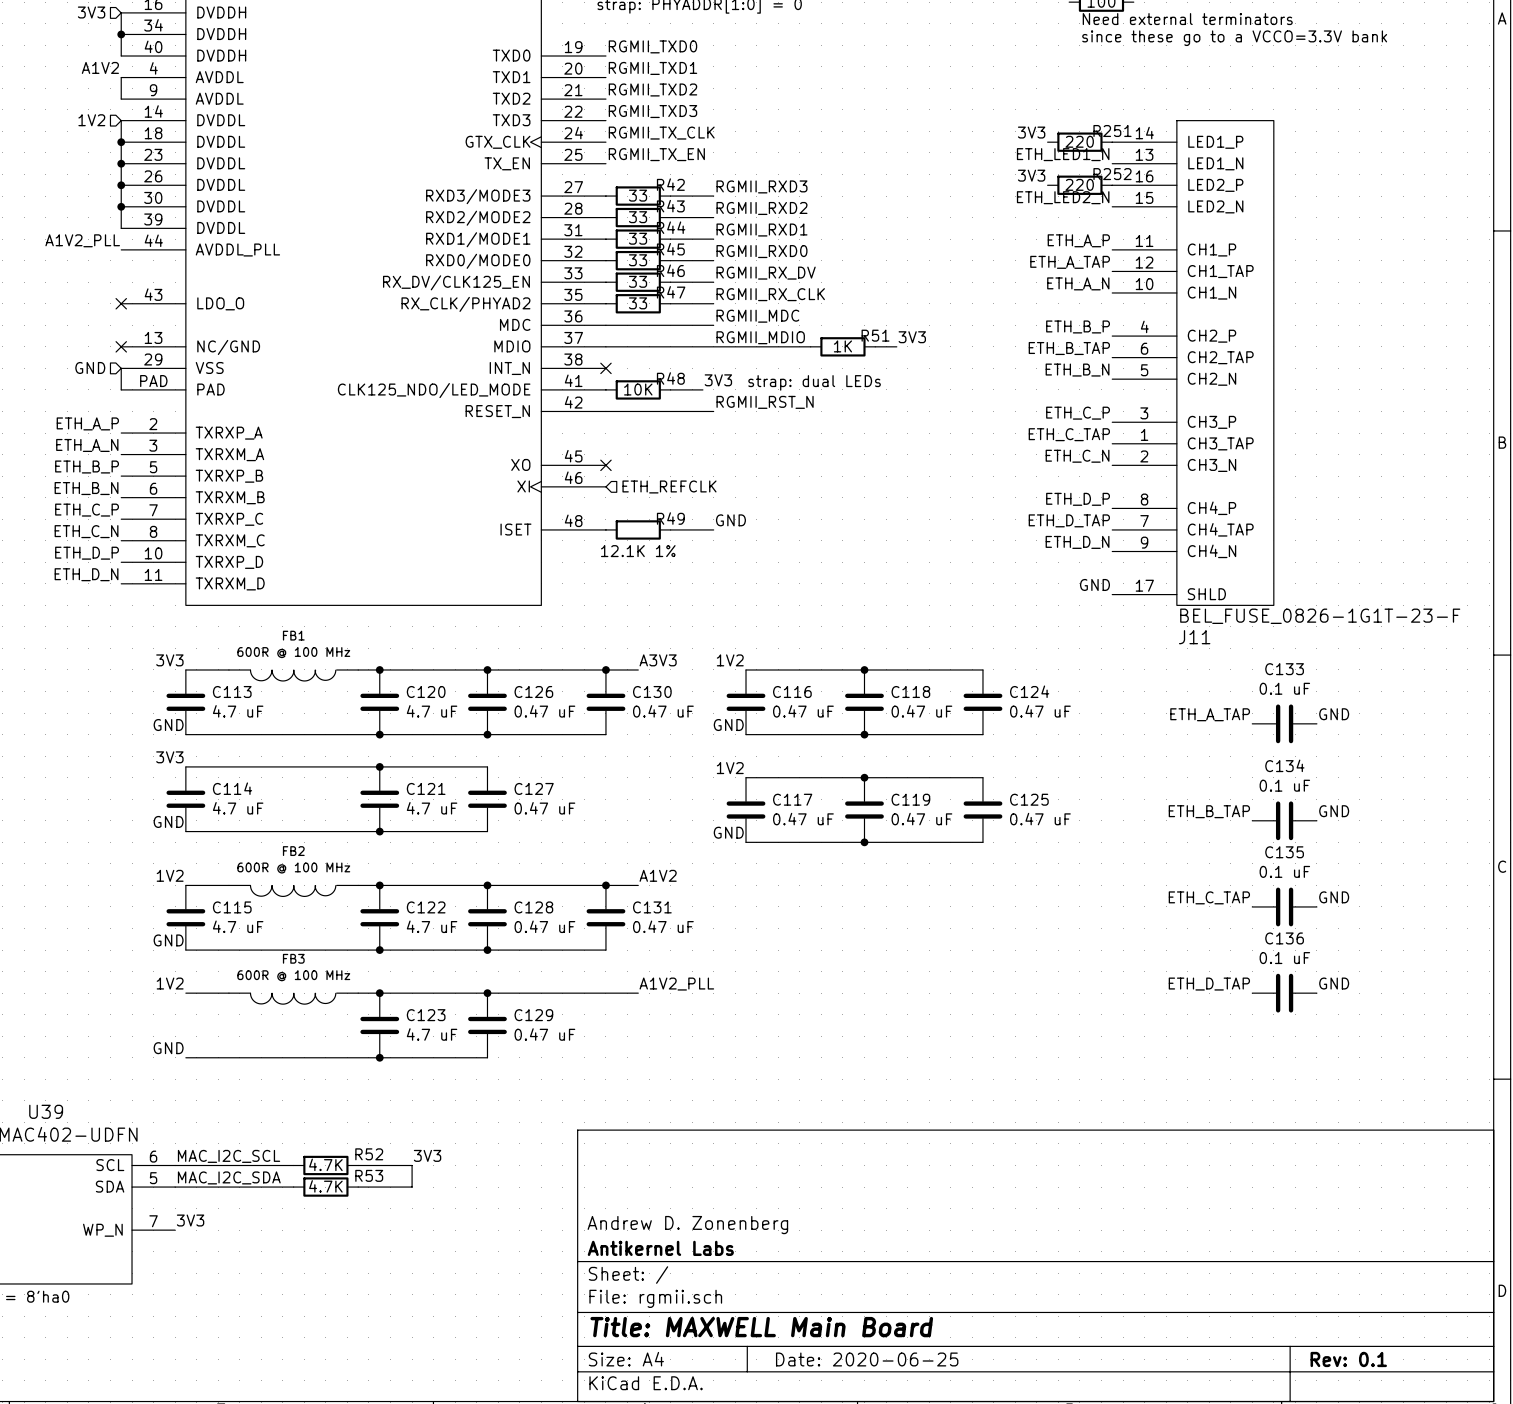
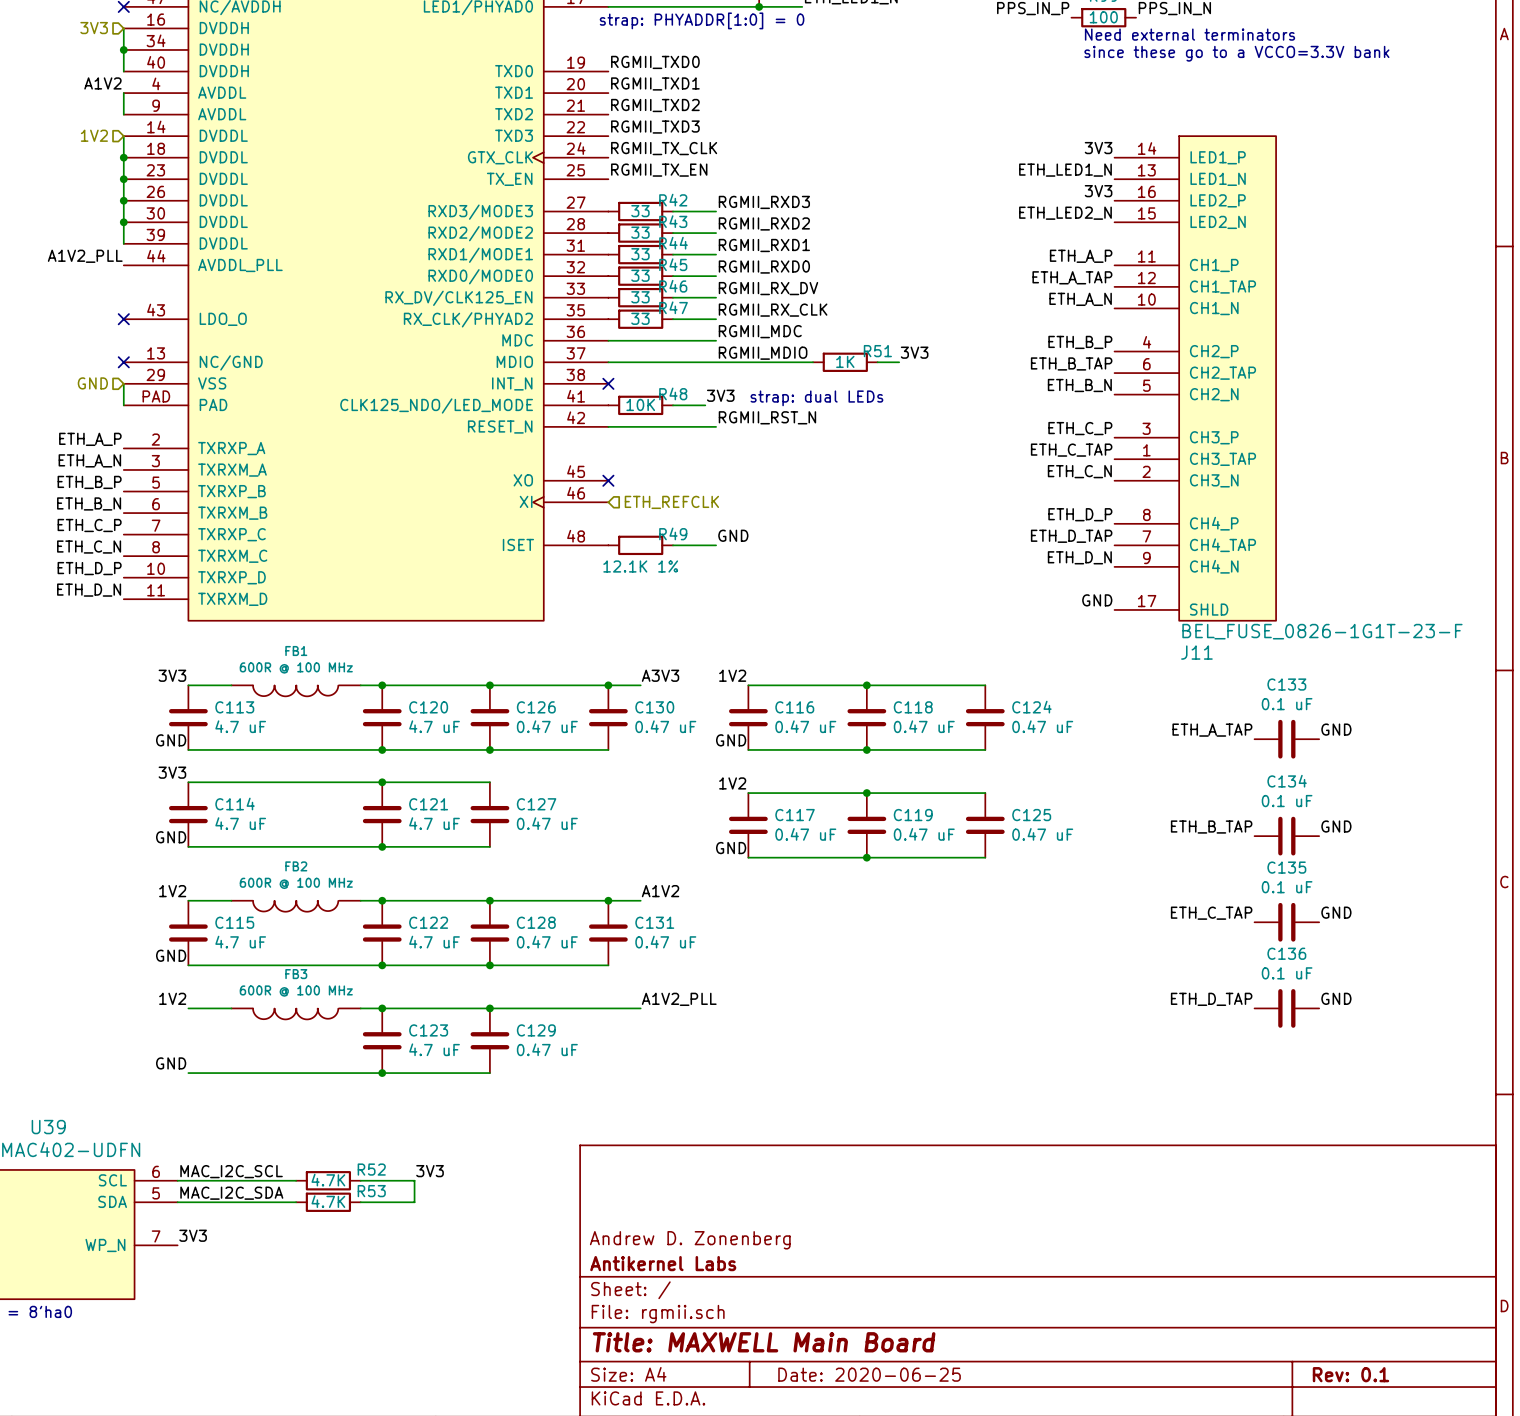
label: 3V3 (1031, 132) -> none
label: none -> 3V3 (1098, 148)
R251: 220 (1079, 142) -> none
label: 3V3 (1031, 175) -> none
label: none -> 3V3 (1098, 191)
R252: 220 (1079, 185) -> none

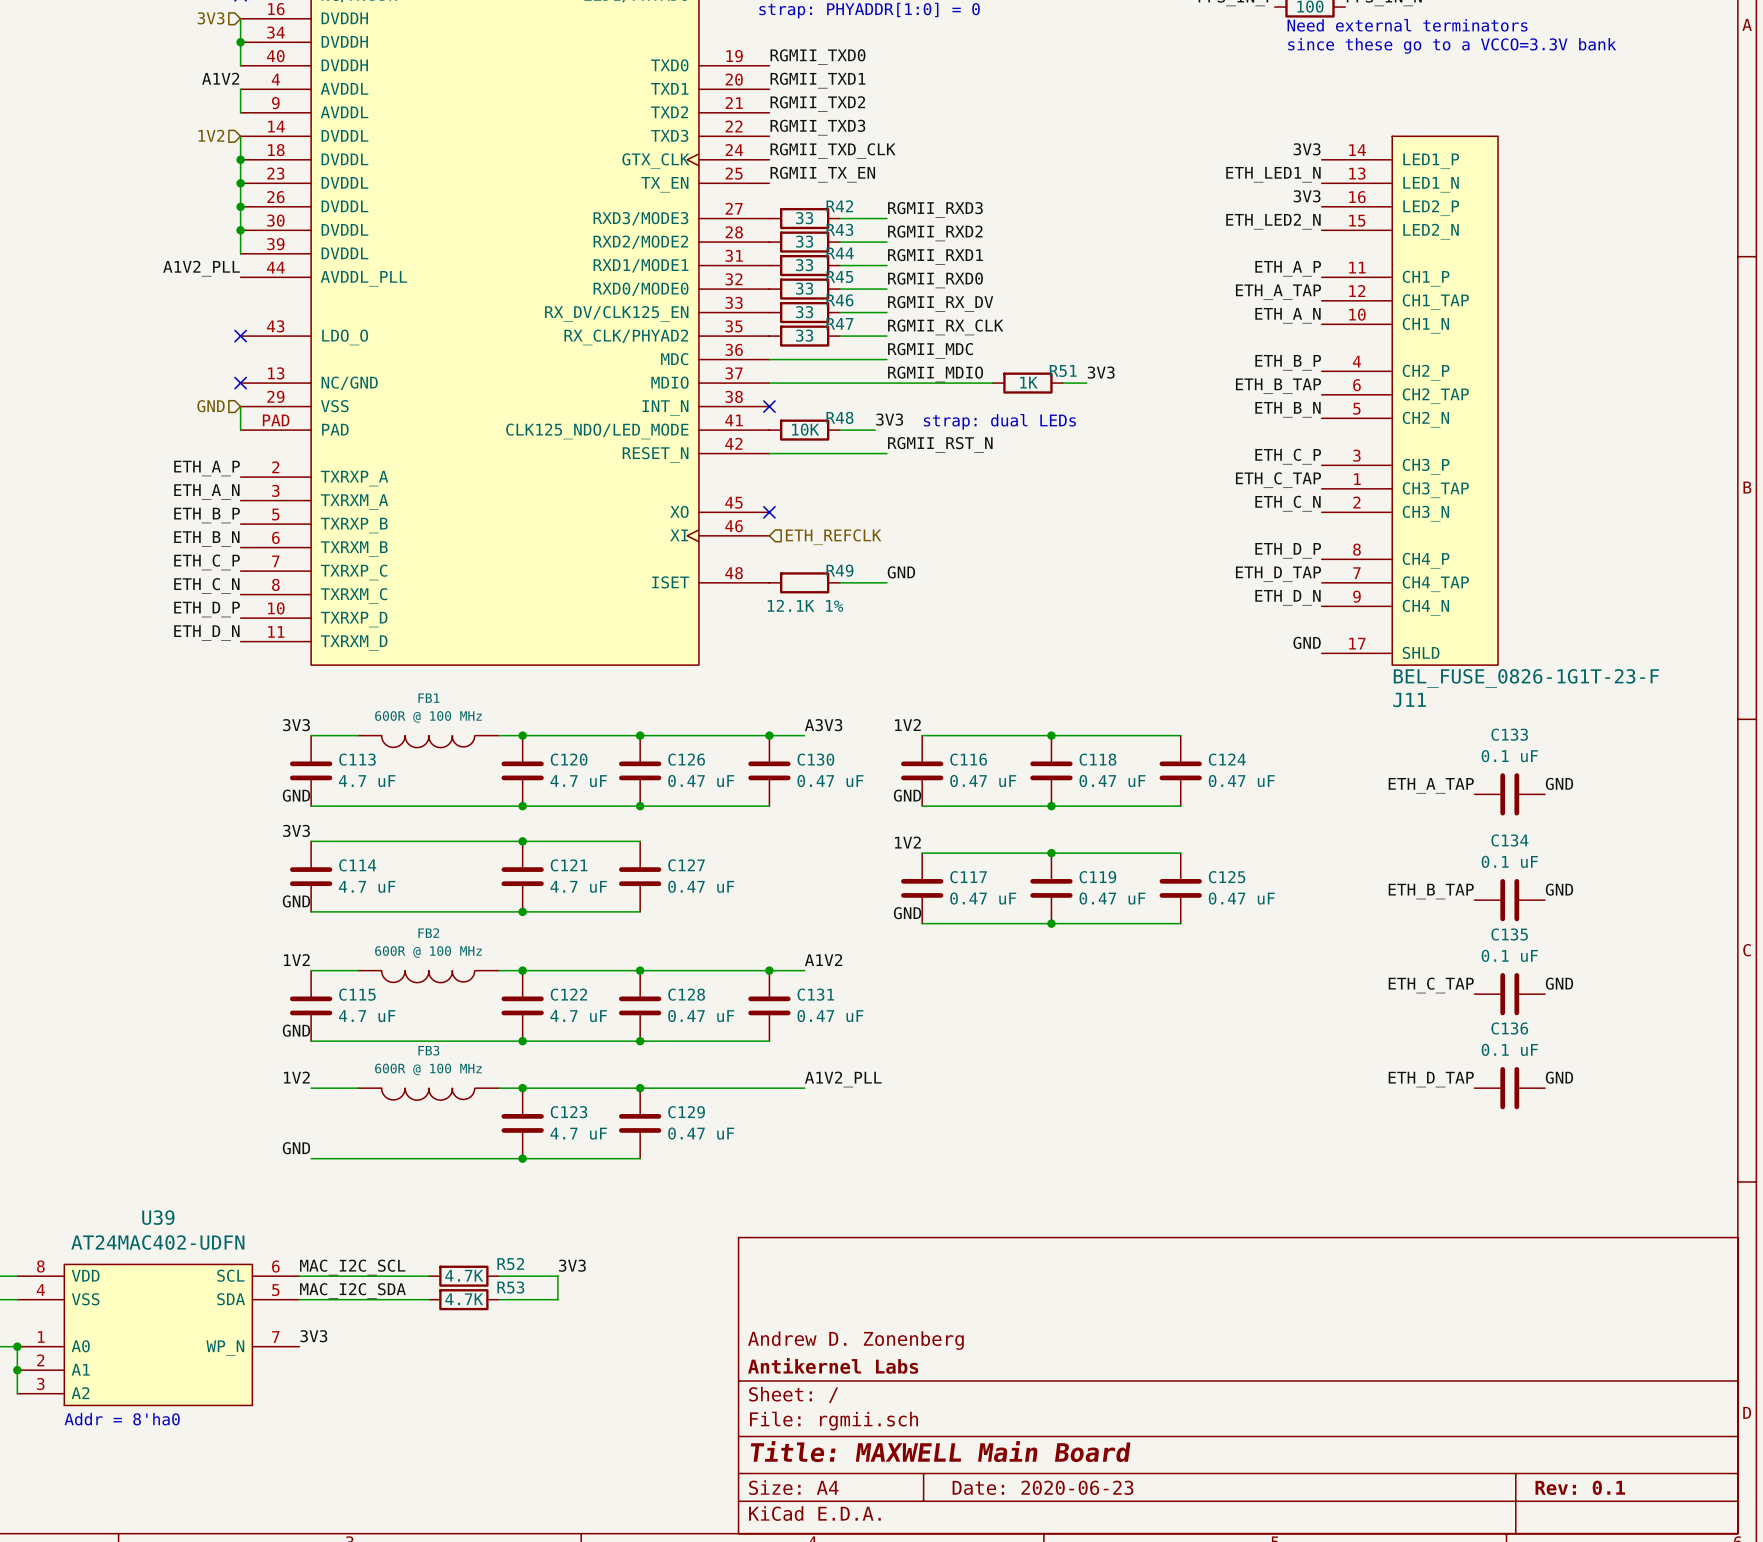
label: RGMII_TX_CLK (664, 148) -> RGMII_TXD_CLK (833, 151)
title block: Date: 2020-06-25 (869, 1374) -> Date: 2020-06-23 (1042, 1487)

